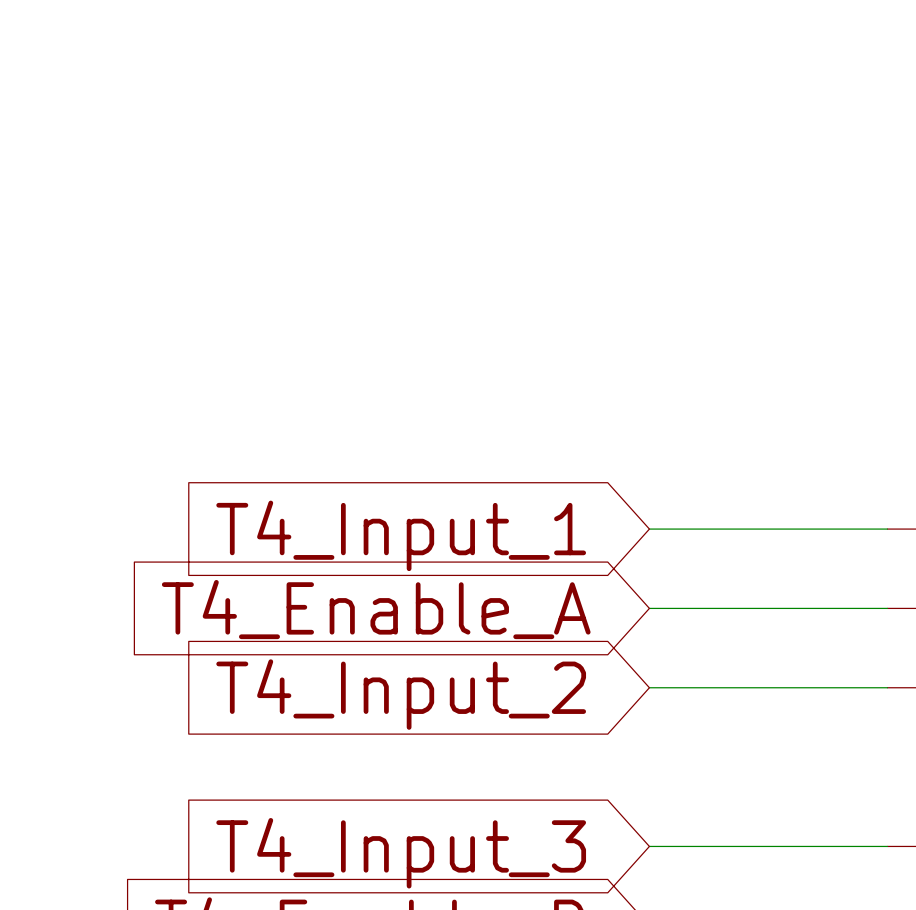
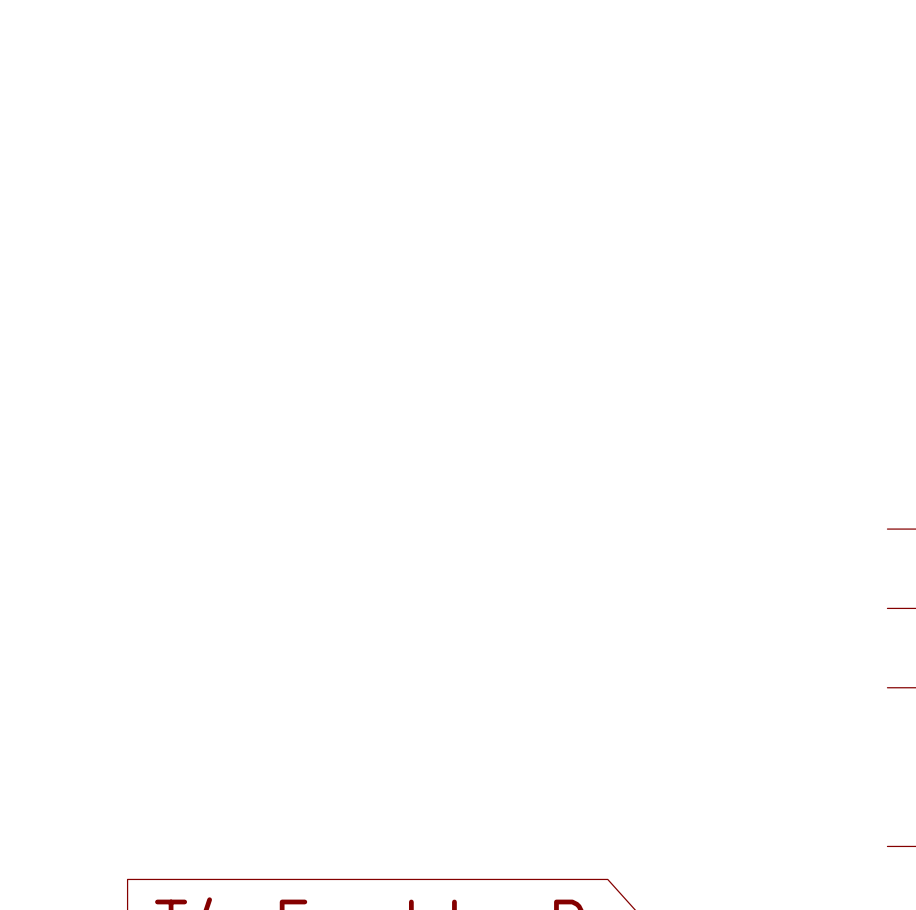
wire: (649, 529) (887, 529) -> none
global label: T4_Input_1 (401, 535) -> none
wire: (649, 608) (887, 608) -> none
global label: T4_Enable_A (376, 609) -> none
wire: (649, 687) (887, 687) -> none
global label: T4_Input_2 (401, 694) -> none
wire: (649, 846) (887, 846) -> none
global label: T4_Input_3 (401, 853) -> none

